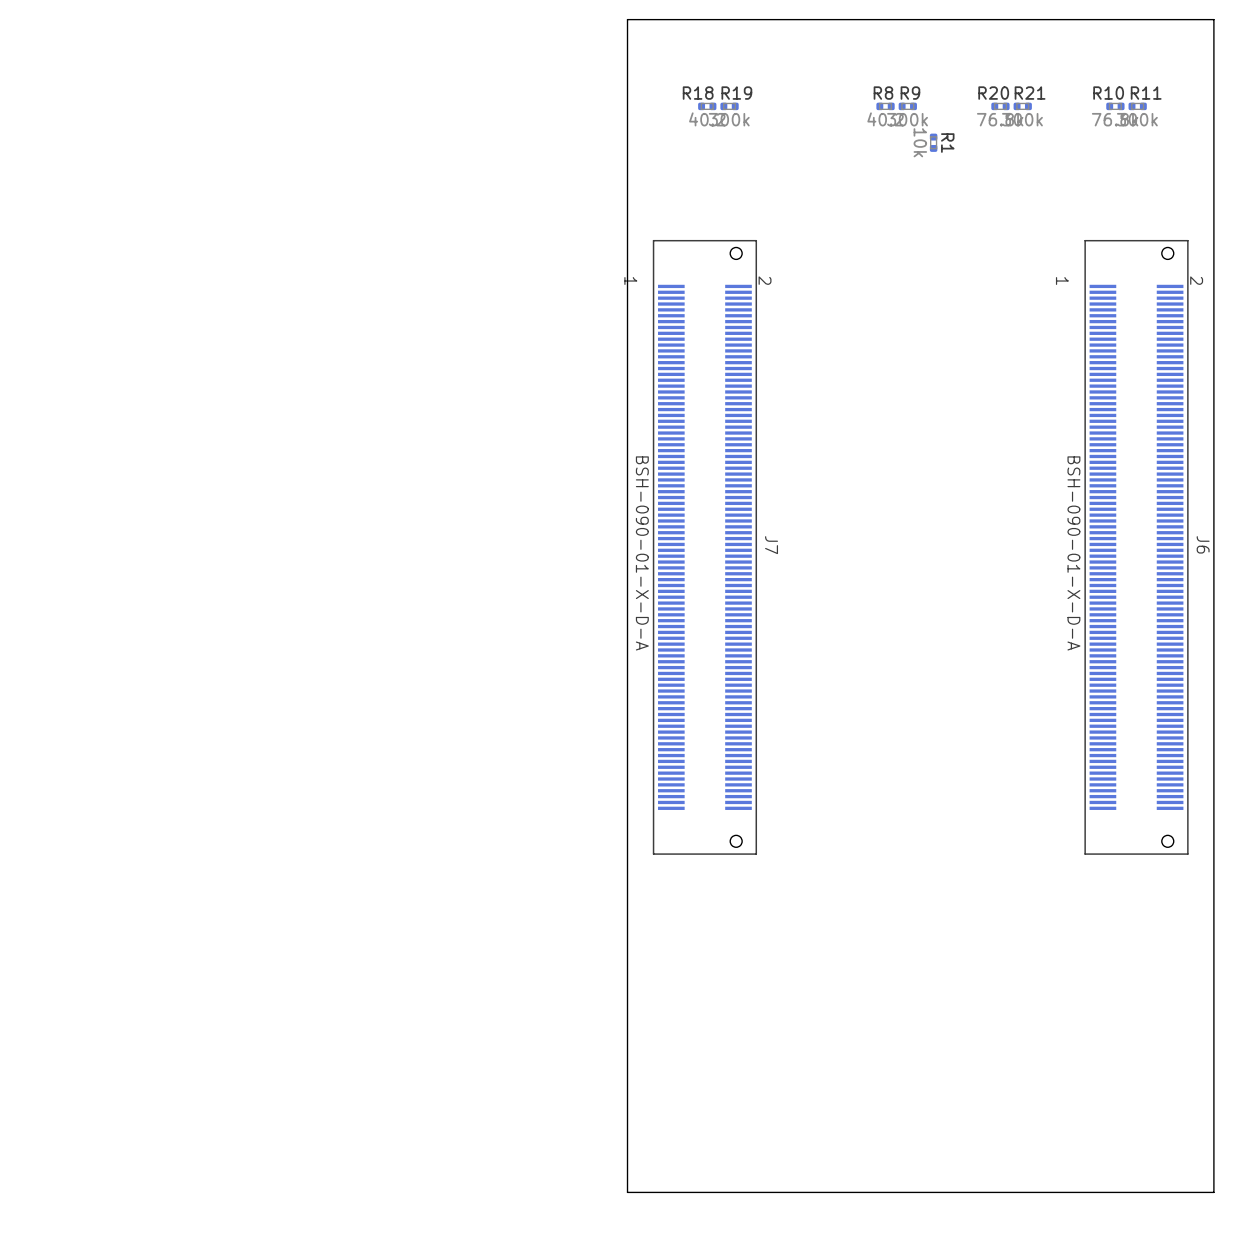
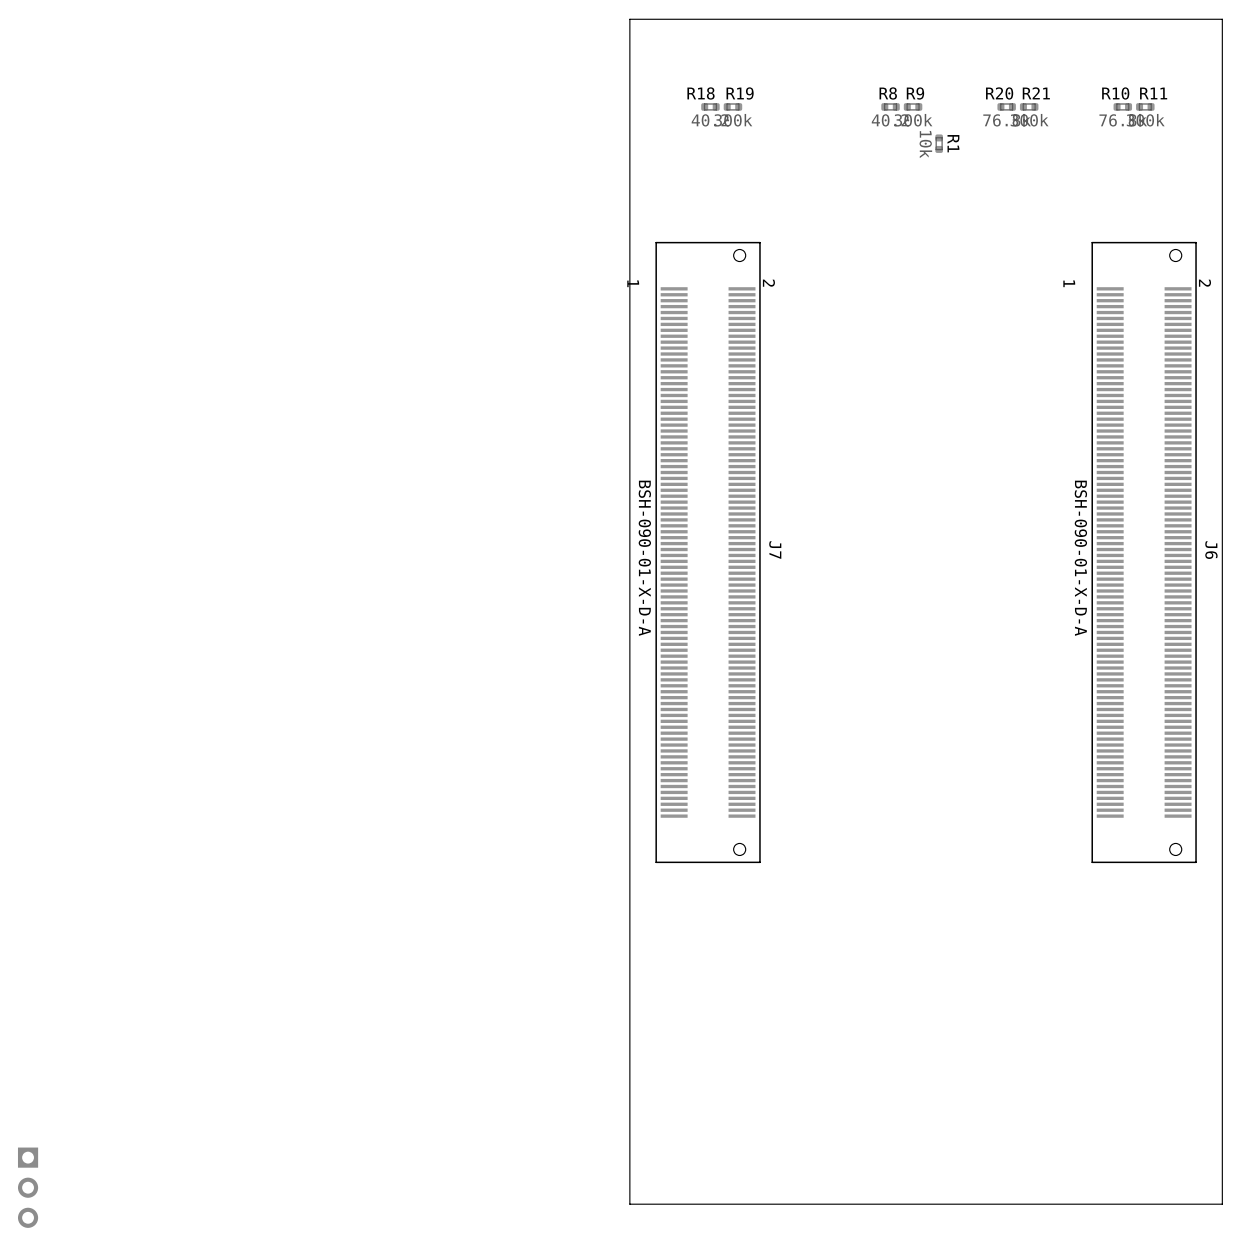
part: none -> (28, 1187)

